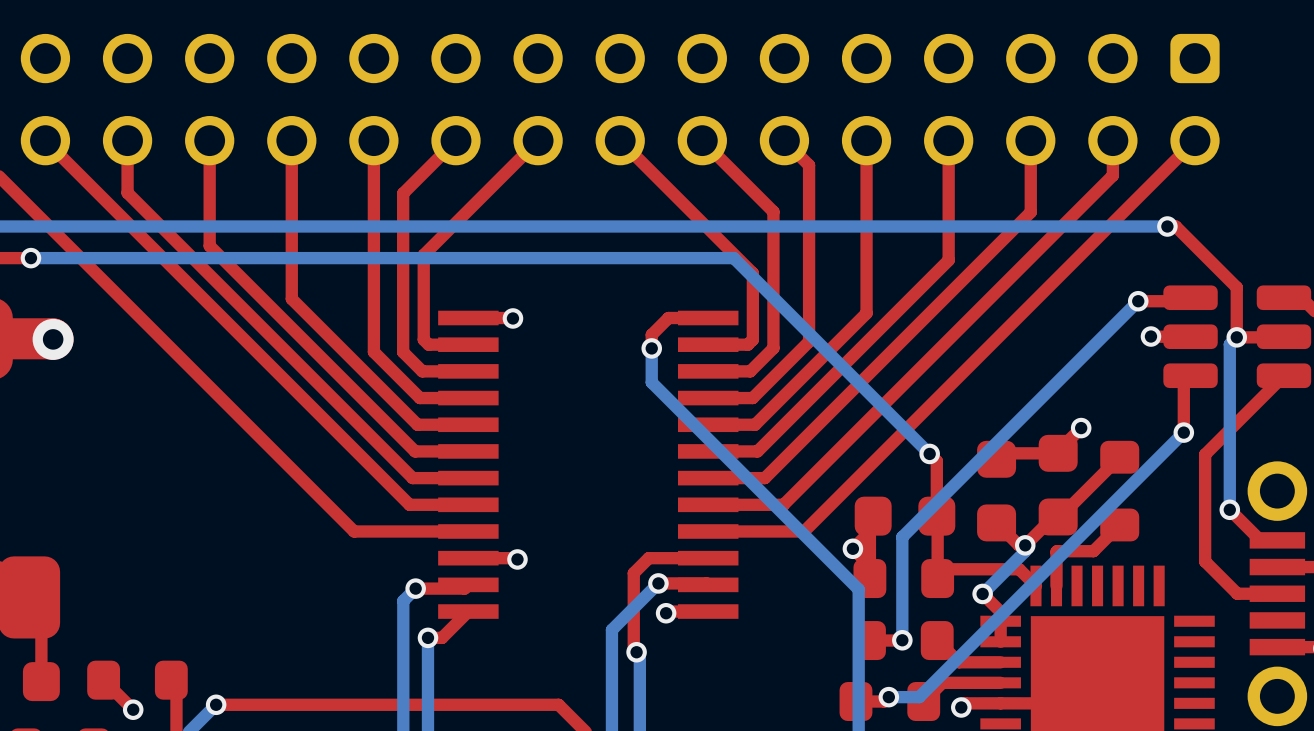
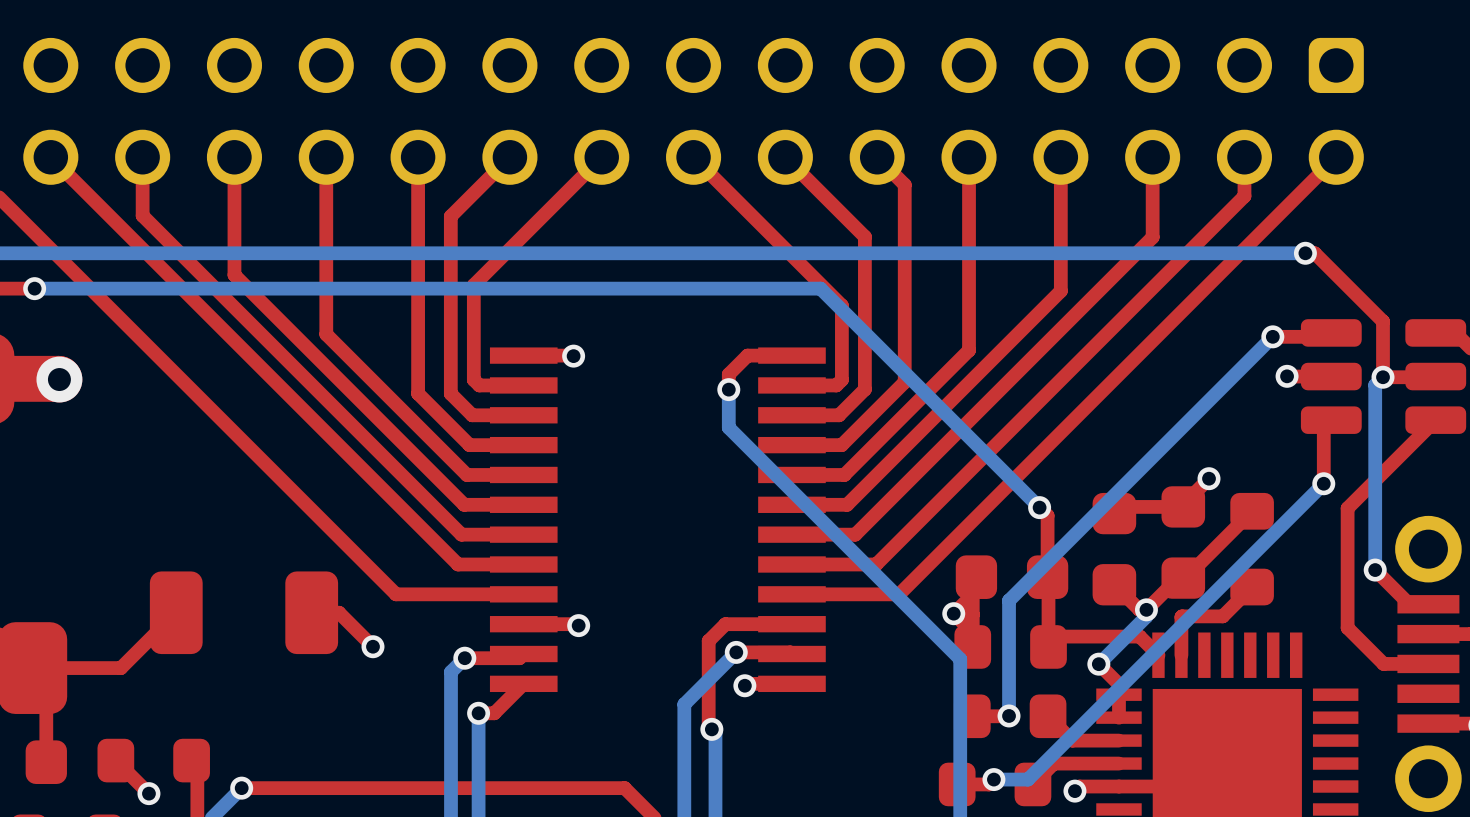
top track: none -> (176, 612) (120, 668) (32, 668)
part: none -> (243, 612)
top track: none -> (311, 612) (339, 612) (372, 646)
via: none -> (372, 646)

